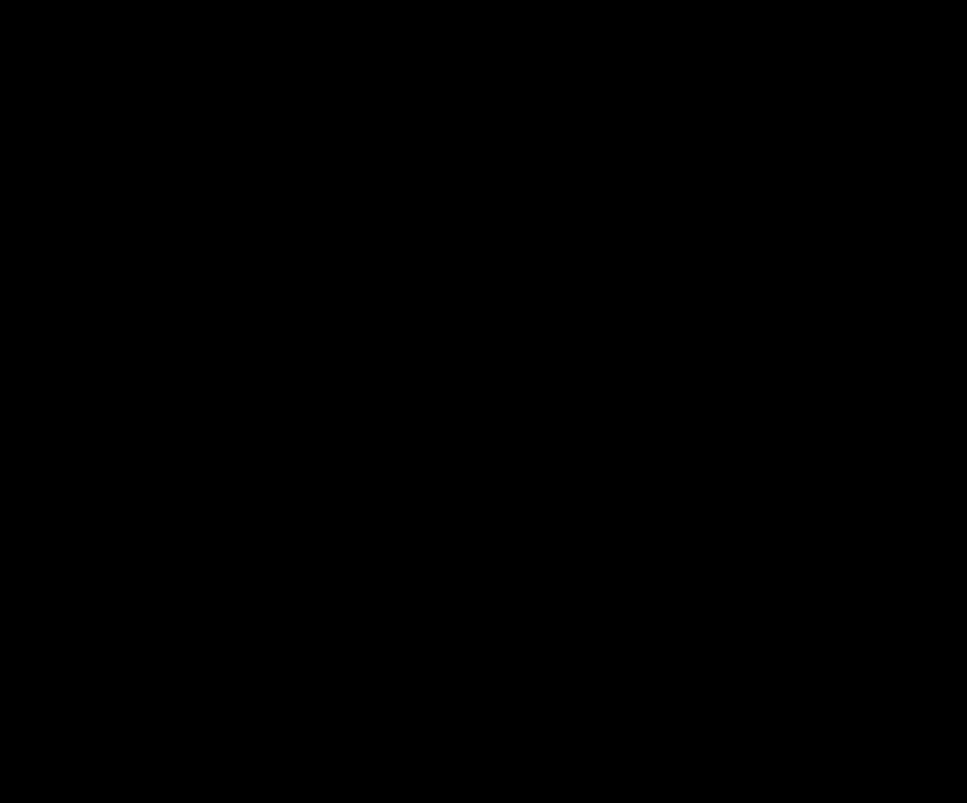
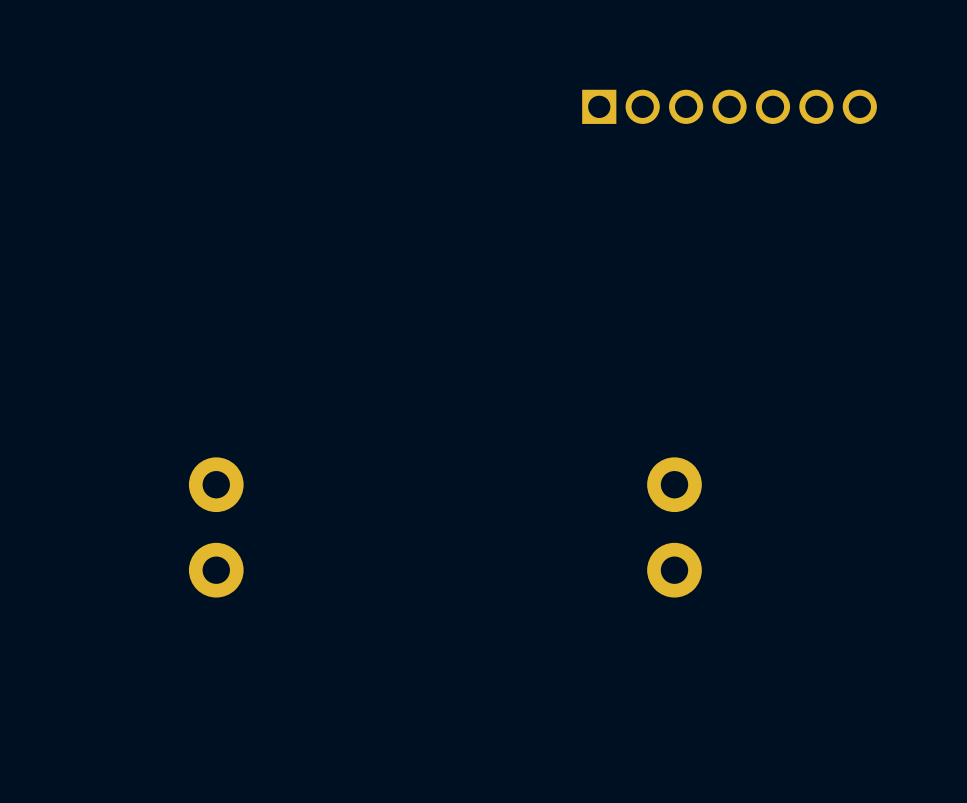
part: none -> (729, 106)
part: none -> (216, 527)
part: none -> (674, 527)

